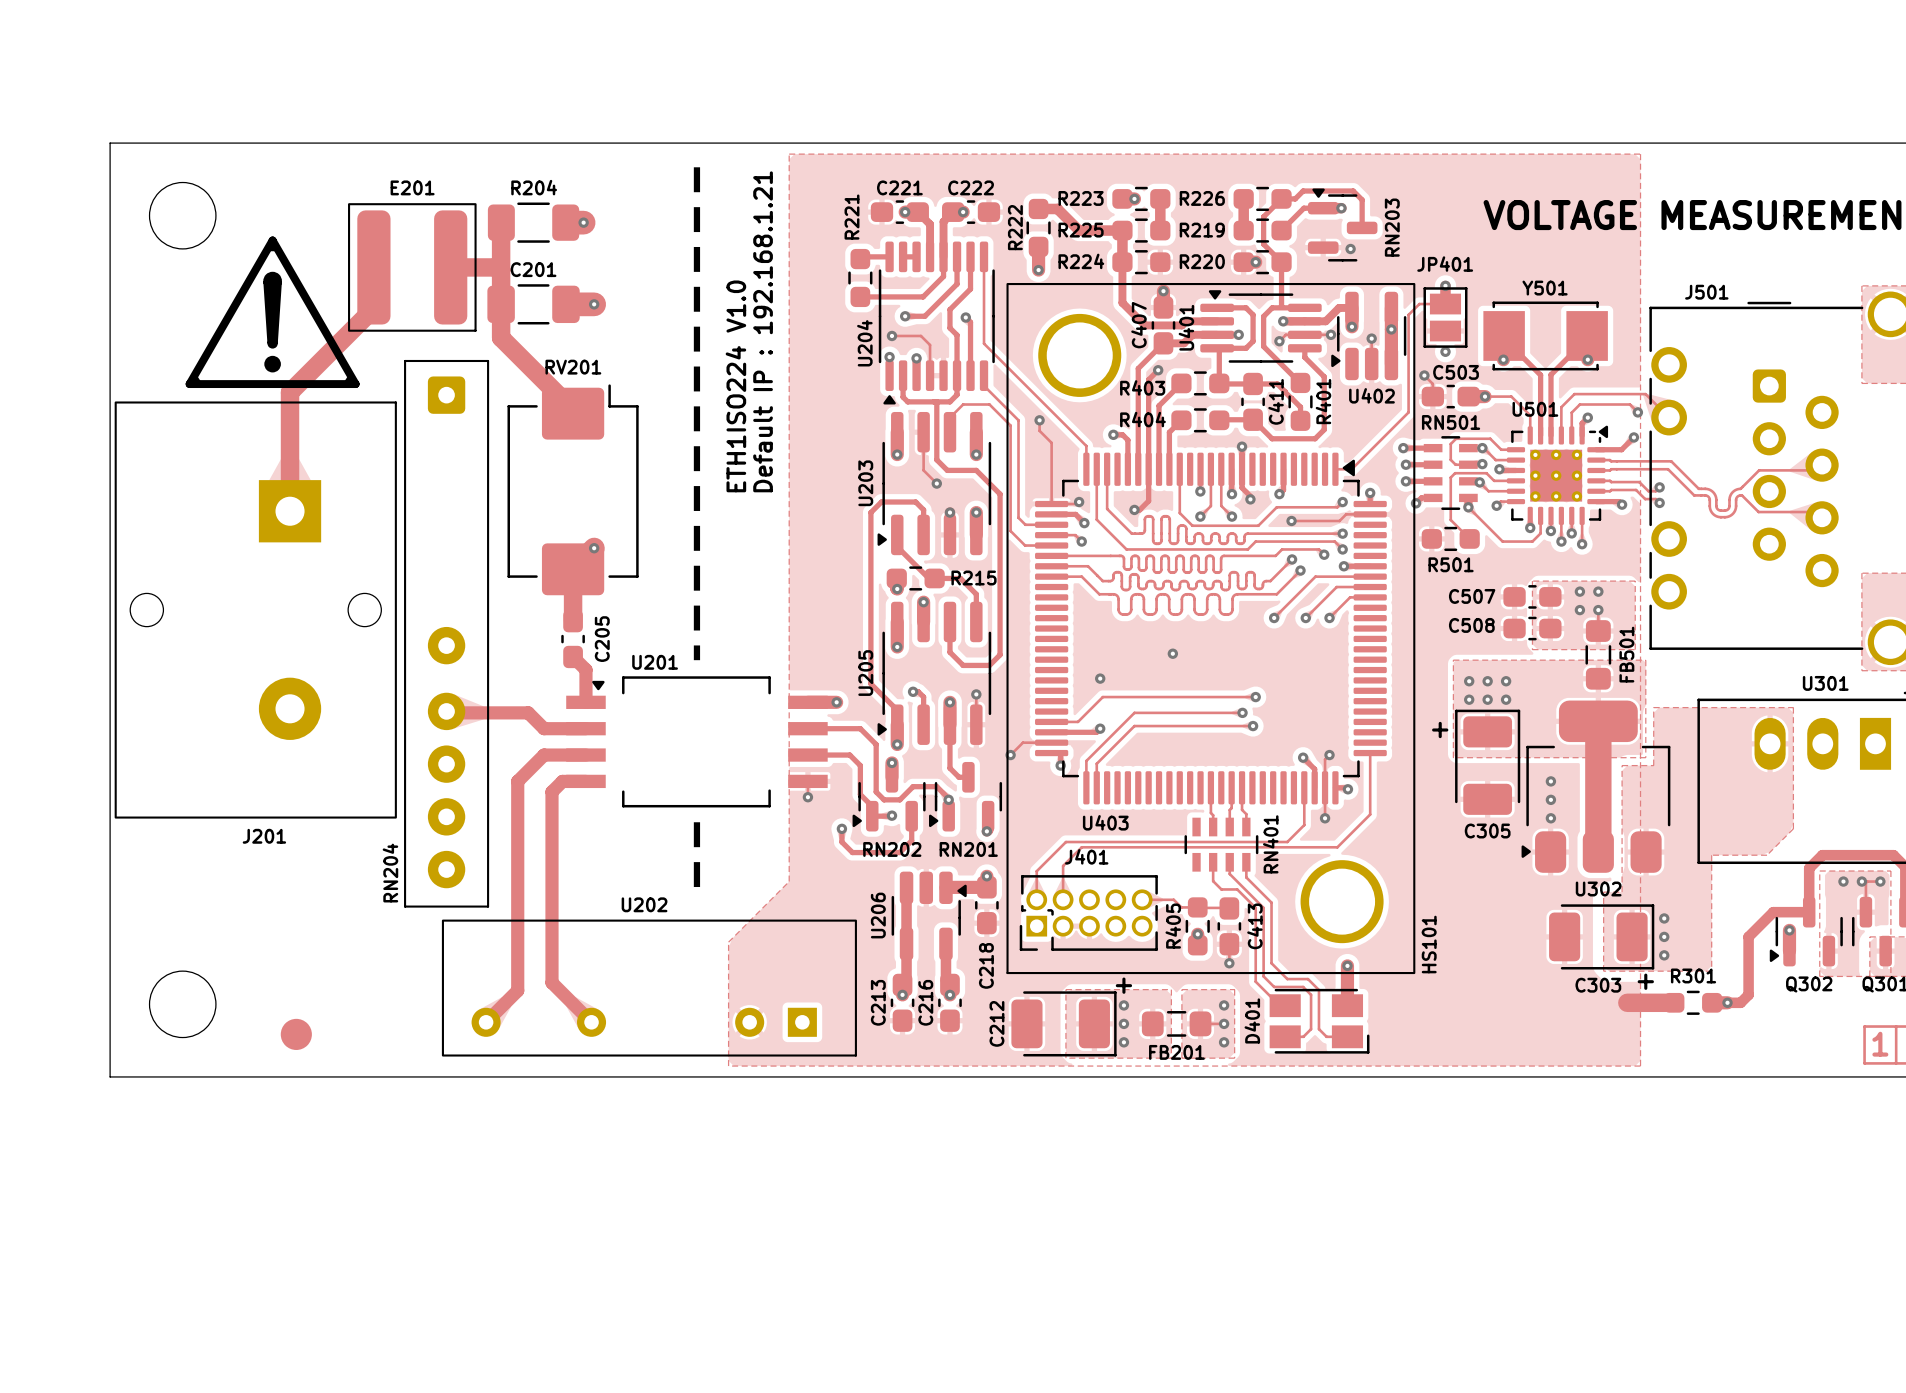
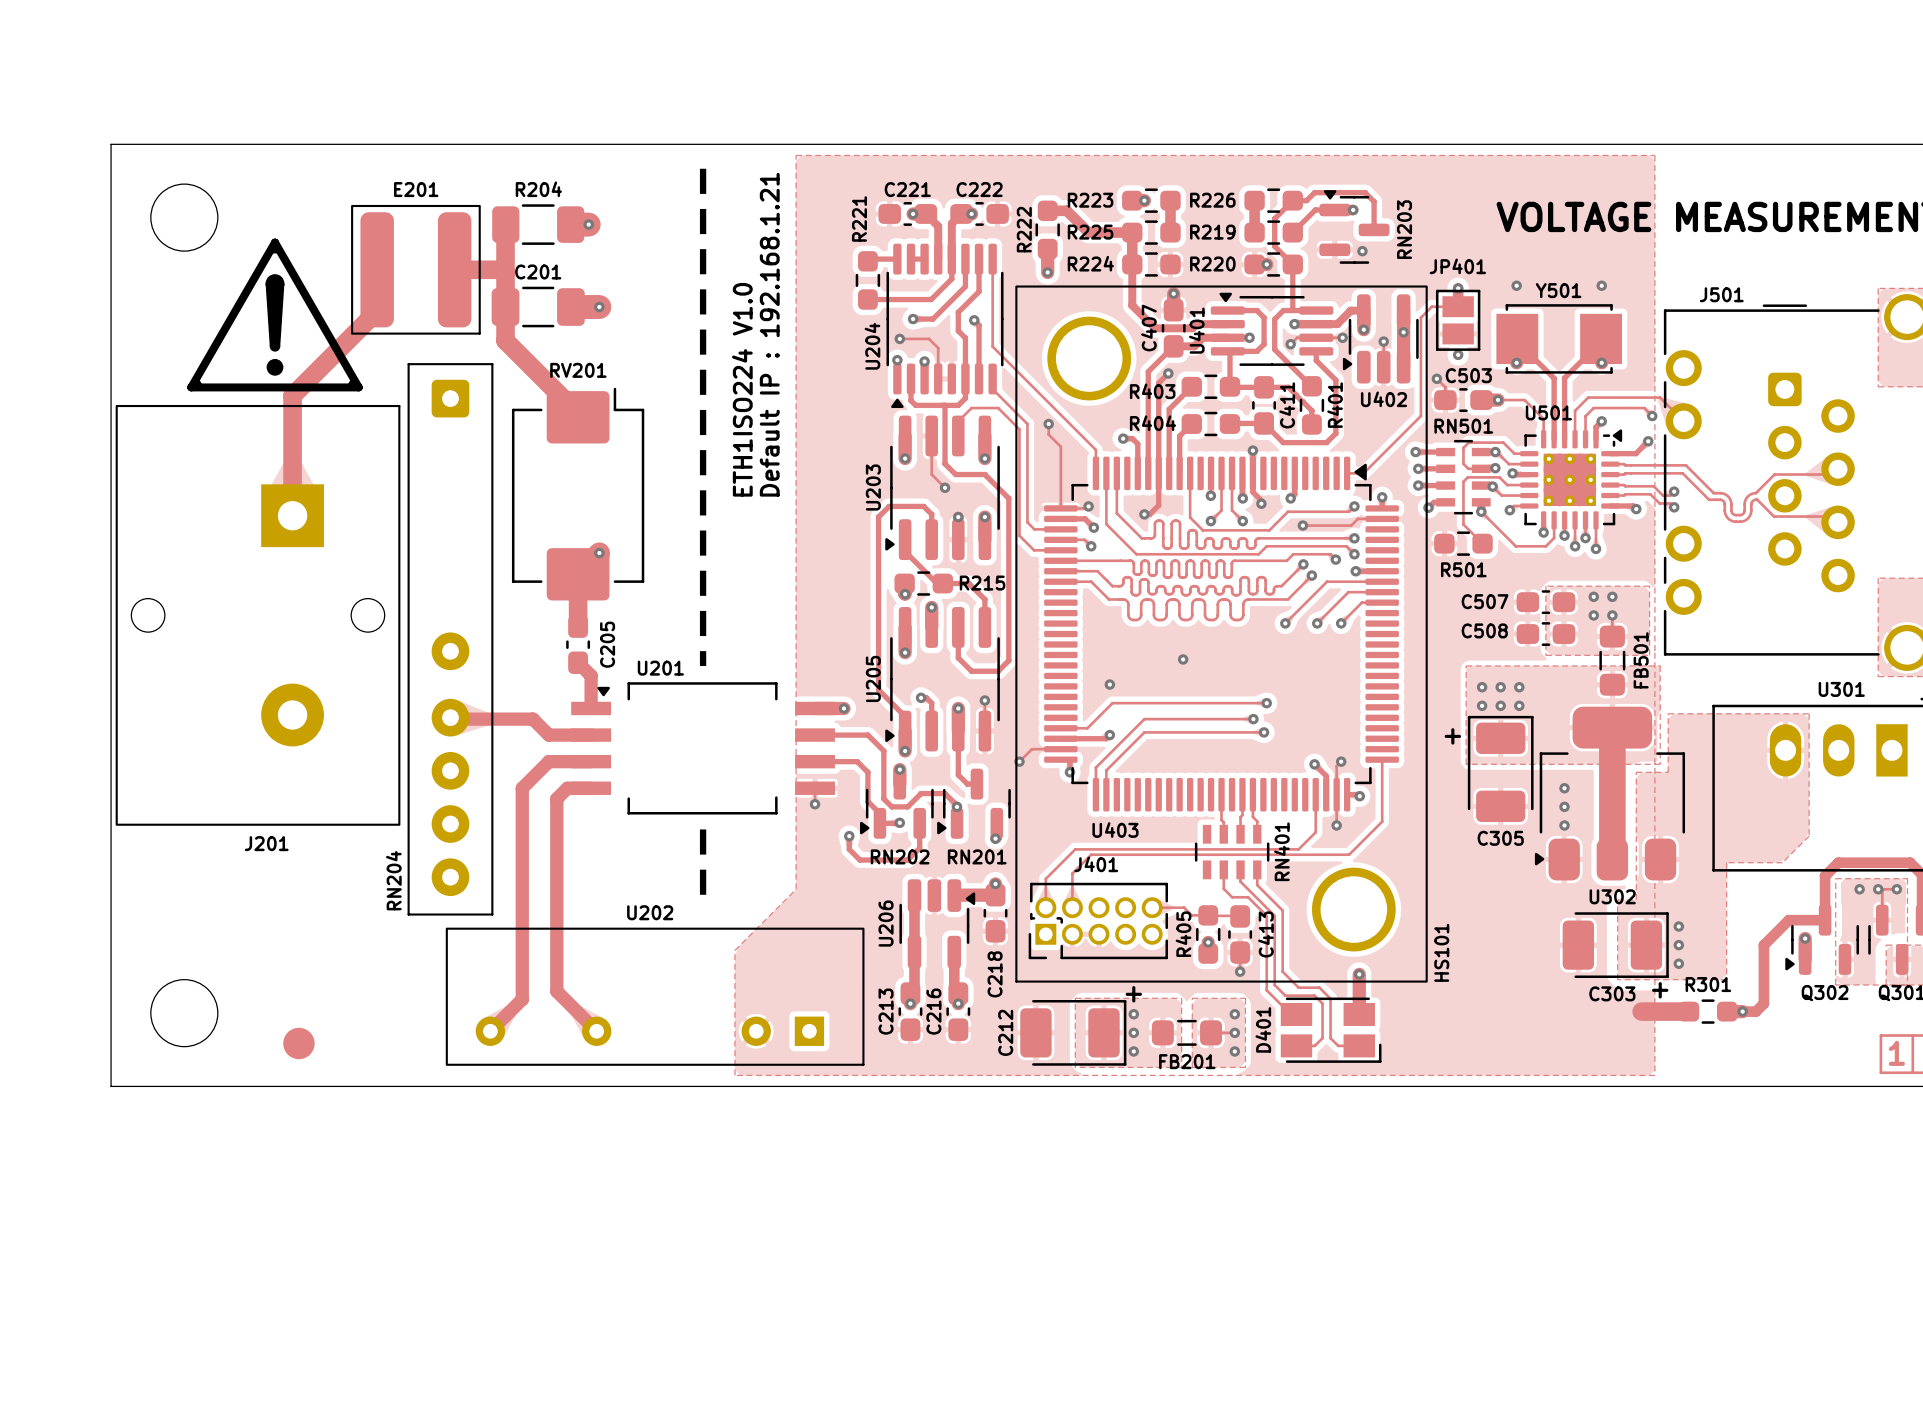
via: none -> (1516, 285)
via: none -> (1601, 285)

